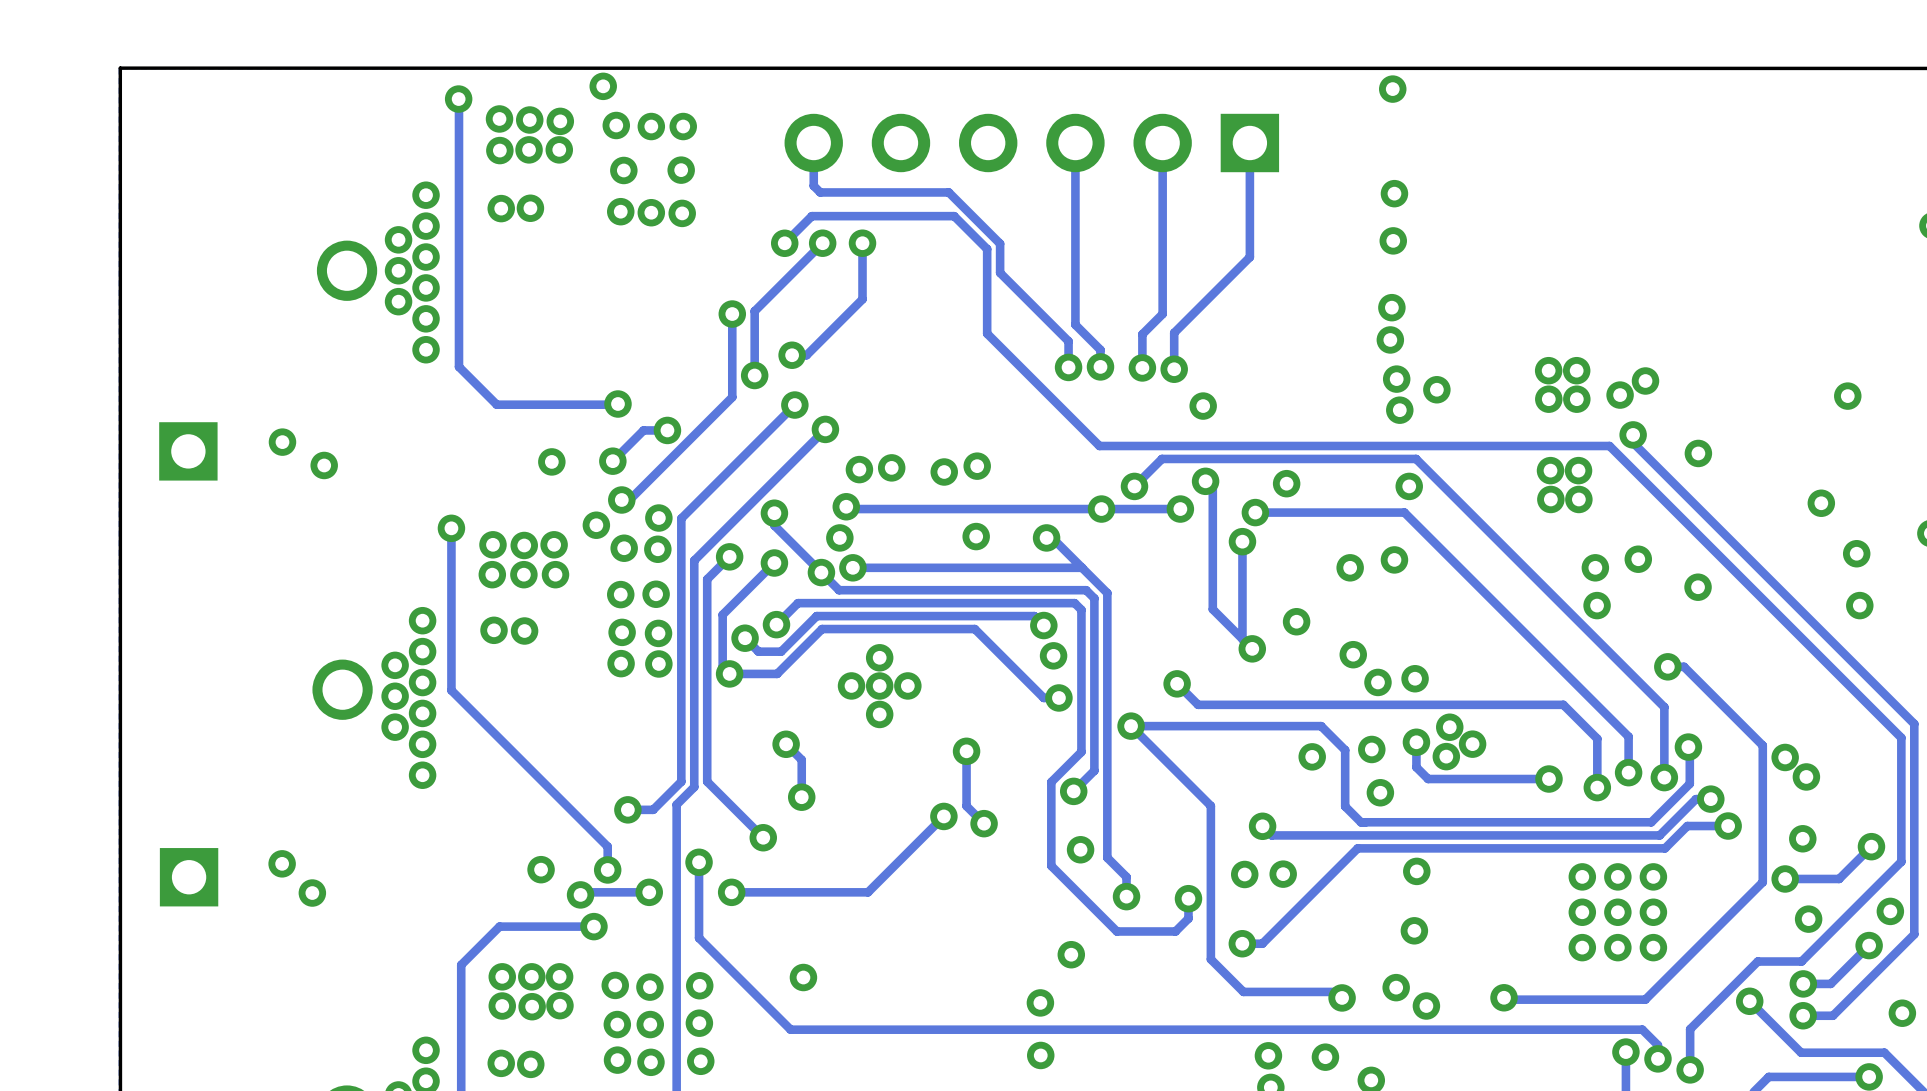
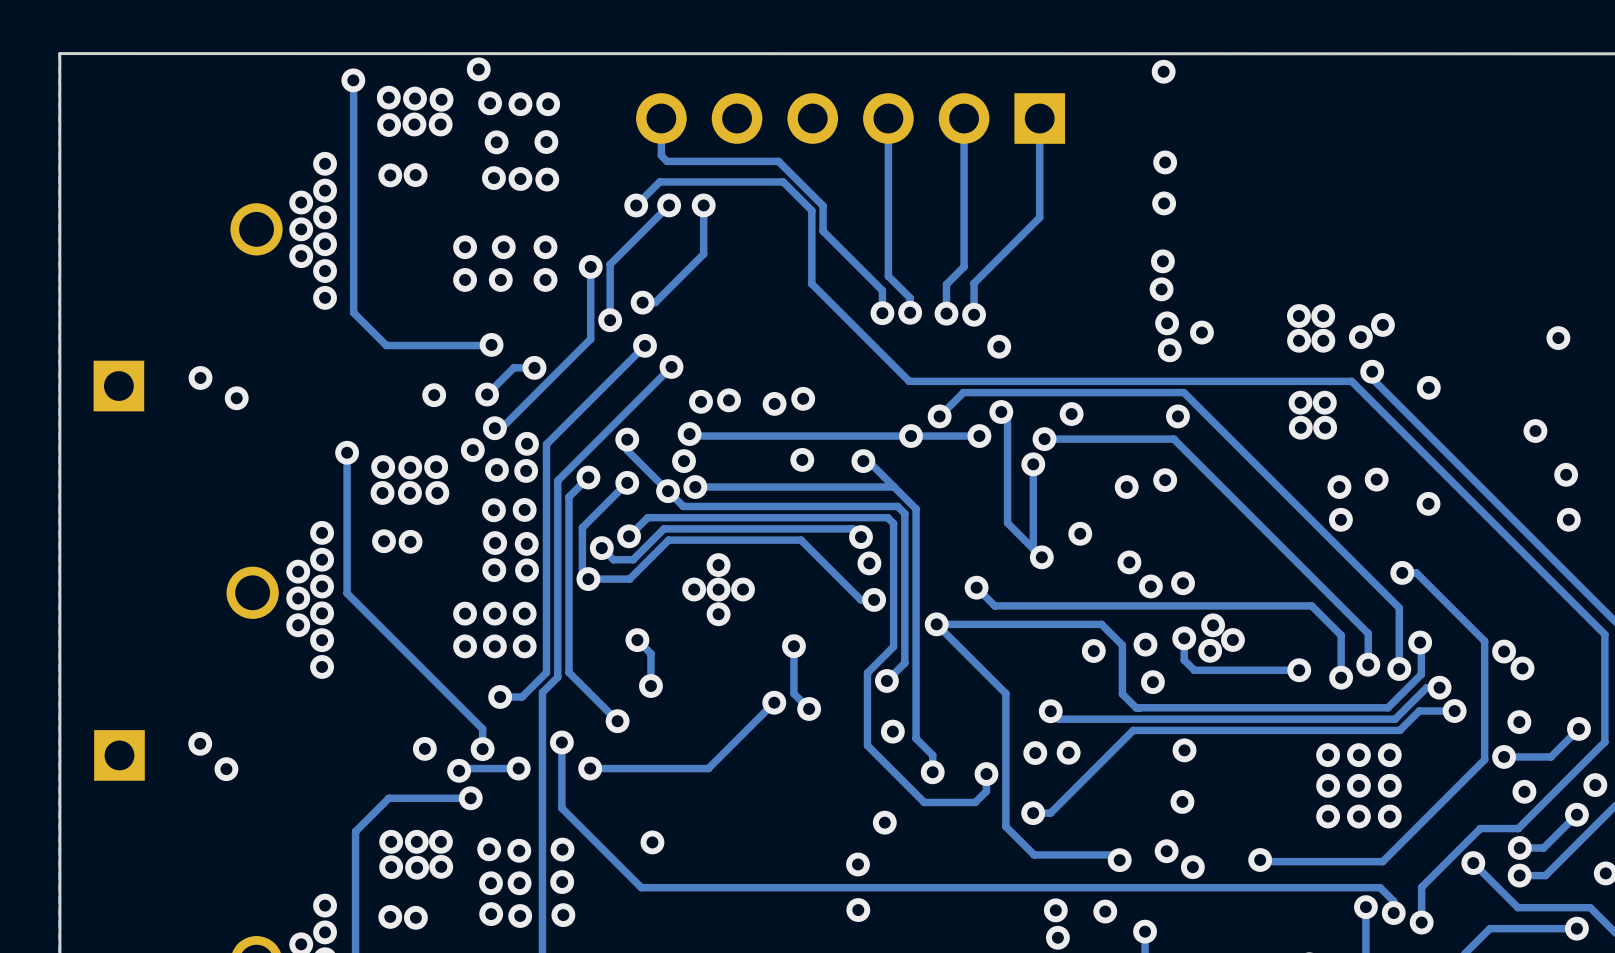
via: none -> (465, 247)
via: none -> (503, 247)
via: none -> (545, 247)
via: none -> (465, 279)
via: none -> (500, 279)
via: none -> (545, 279)
via: none -> (465, 613)
via: none -> (494, 613)
via: none -> (524, 613)
via: none -> (465, 646)
via: none -> (494, 646)
via: none -> (524, 646)

